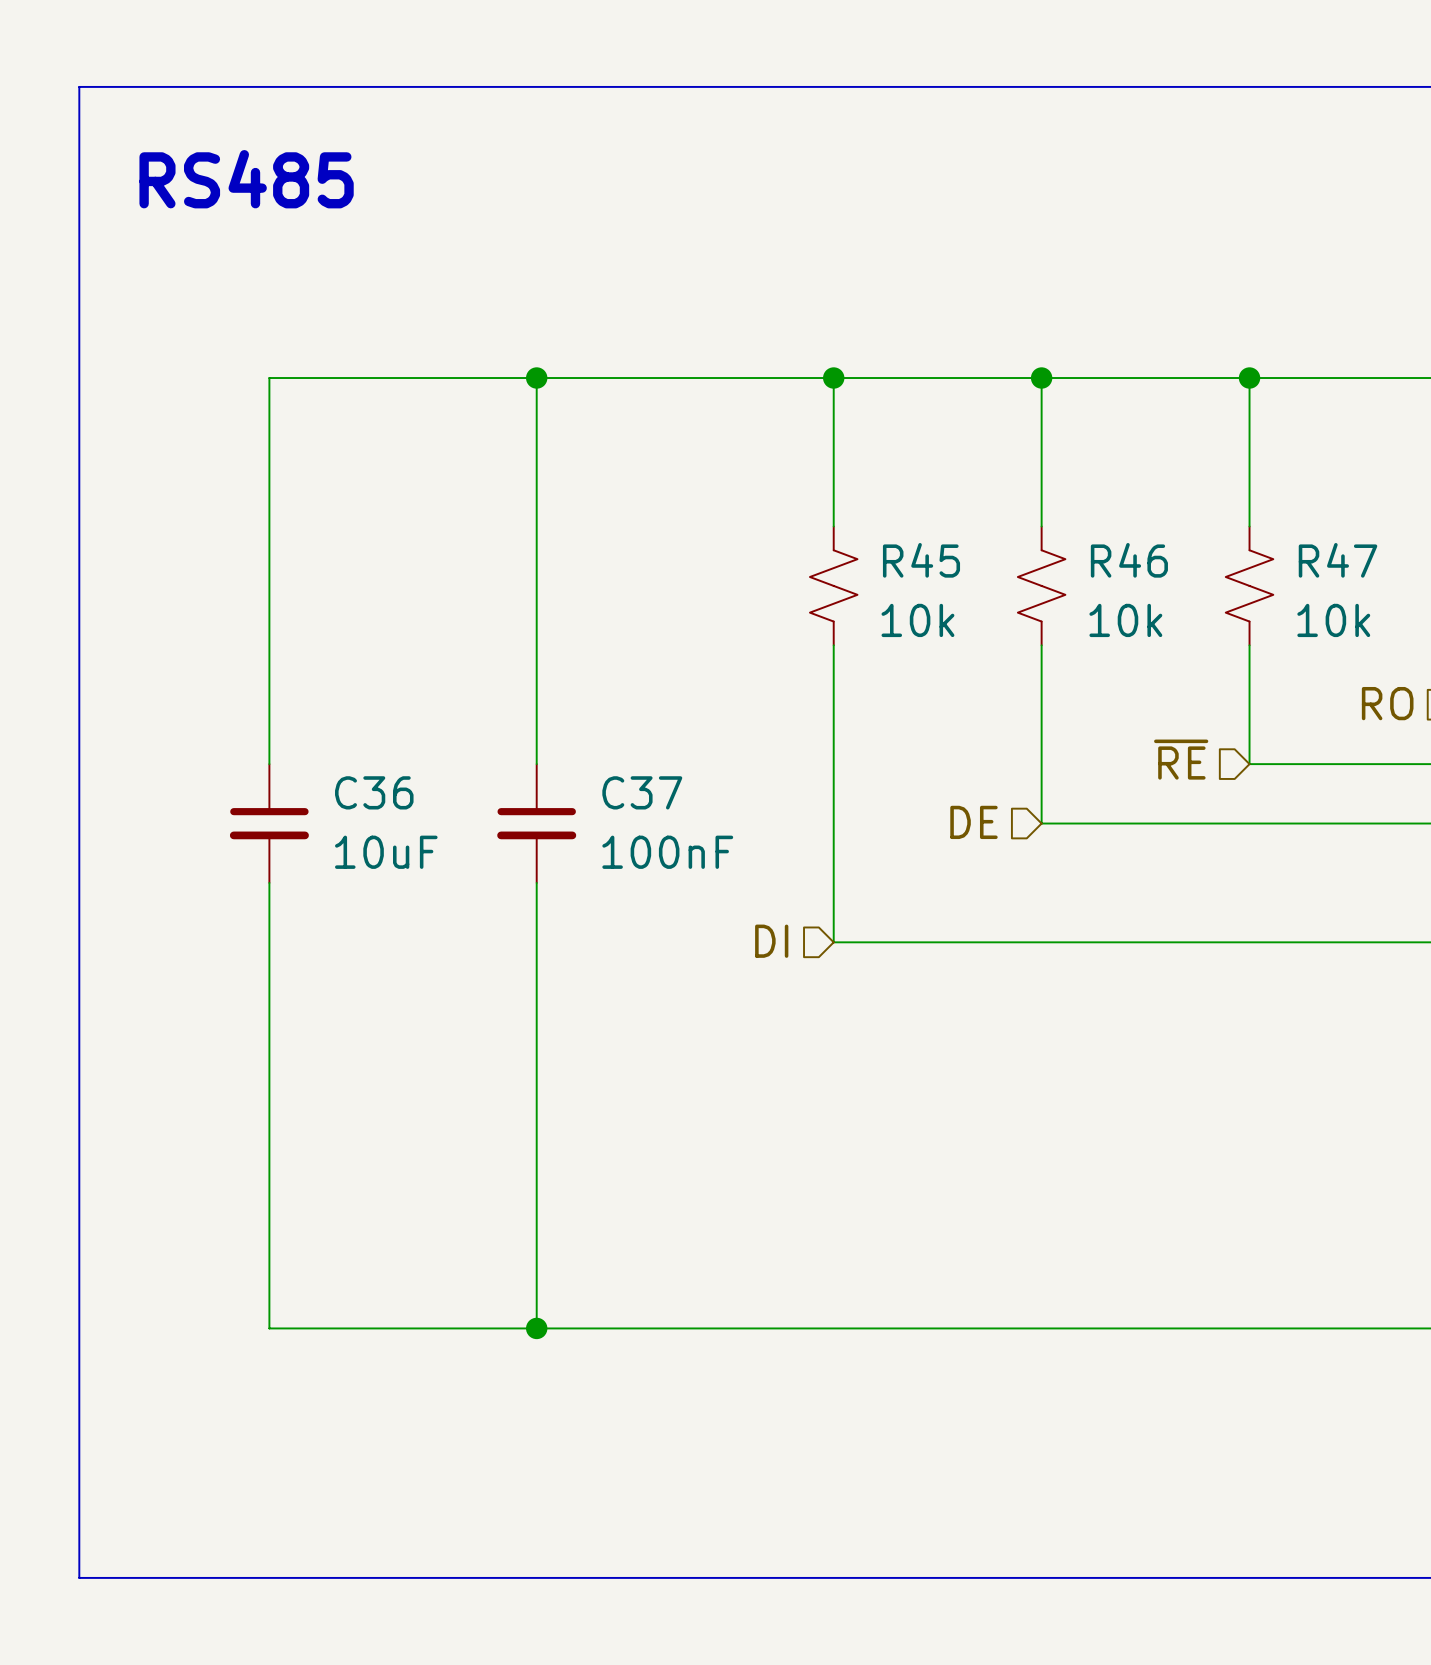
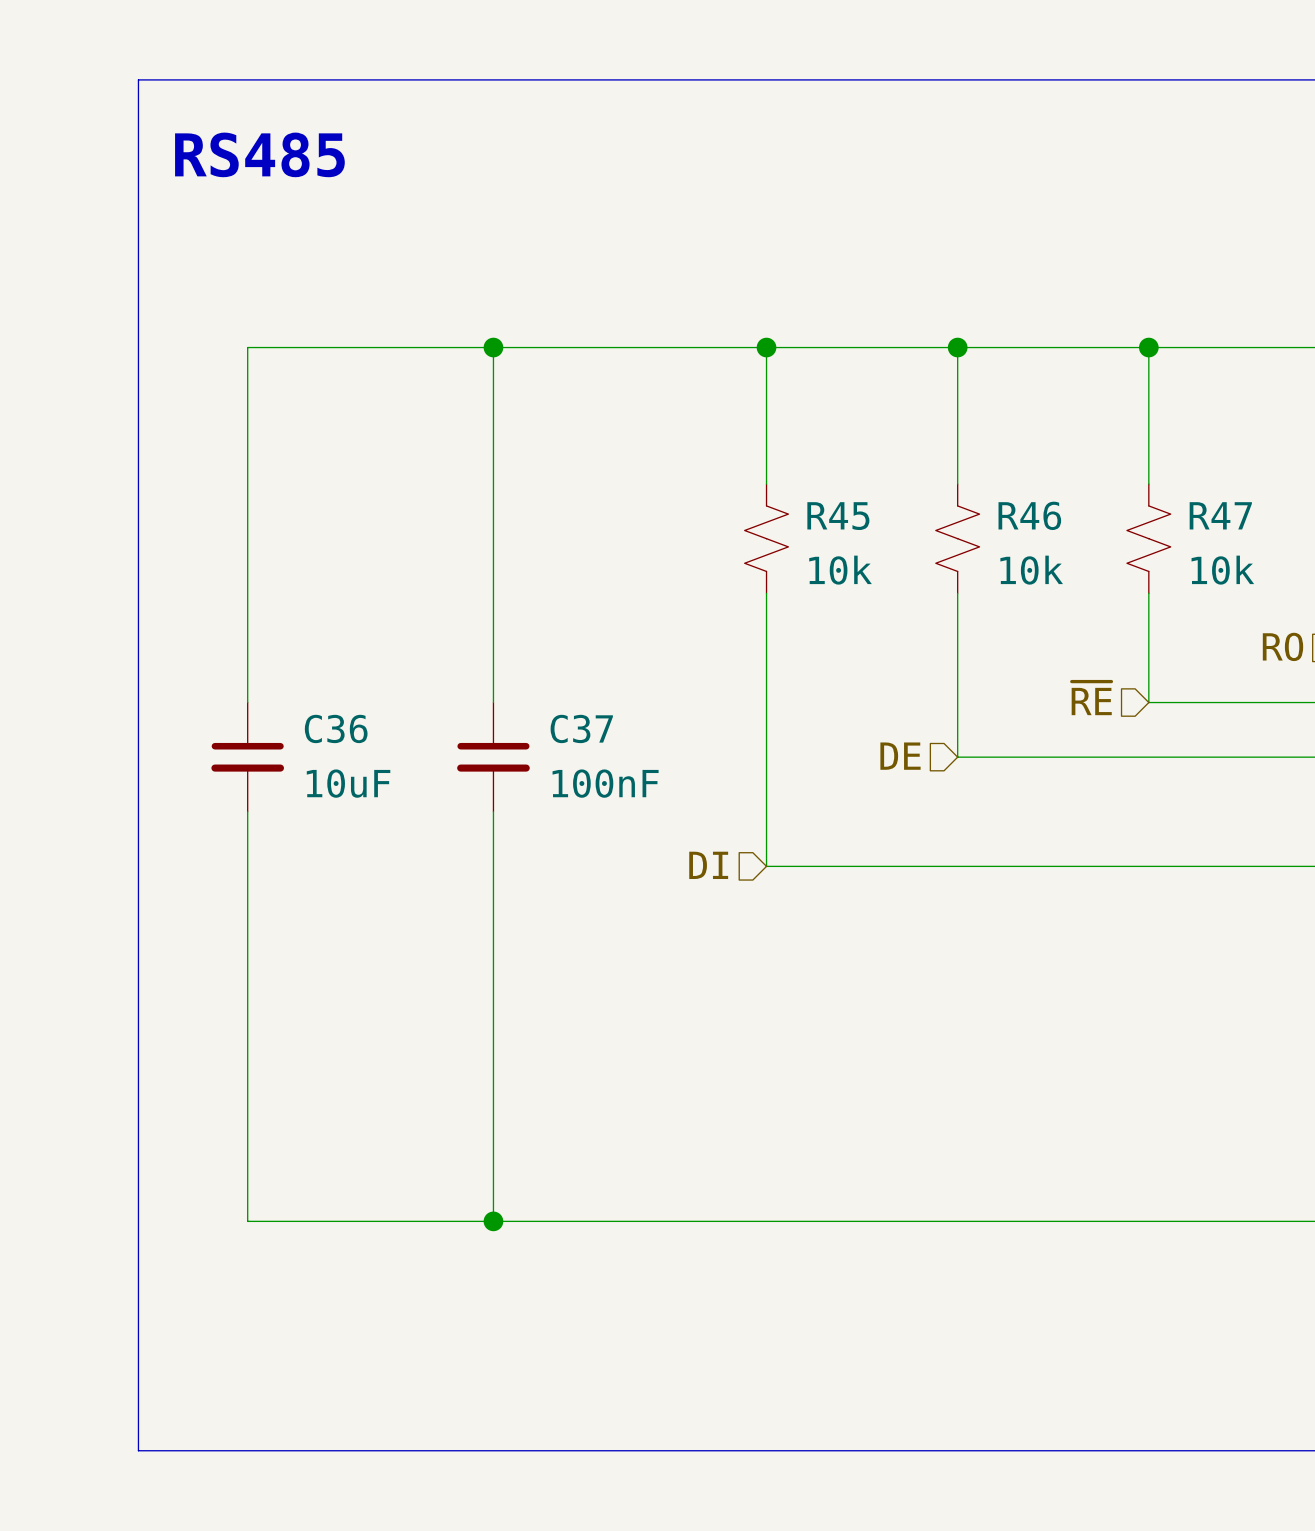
line: (150, 86) (79, 86) (79, 1577) (150, 1577) -> (138, 79) (138, 1450)
text position: RS485 (246, 179) -> RS485 (259, 154)

